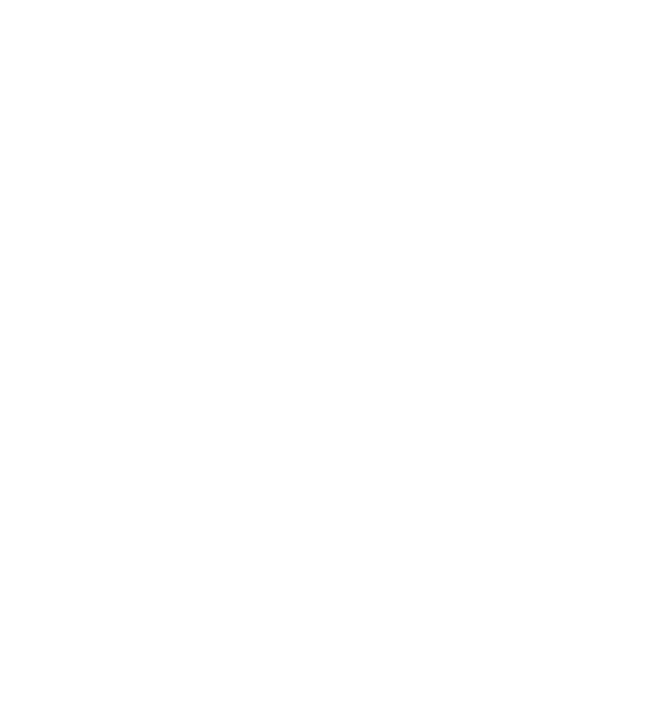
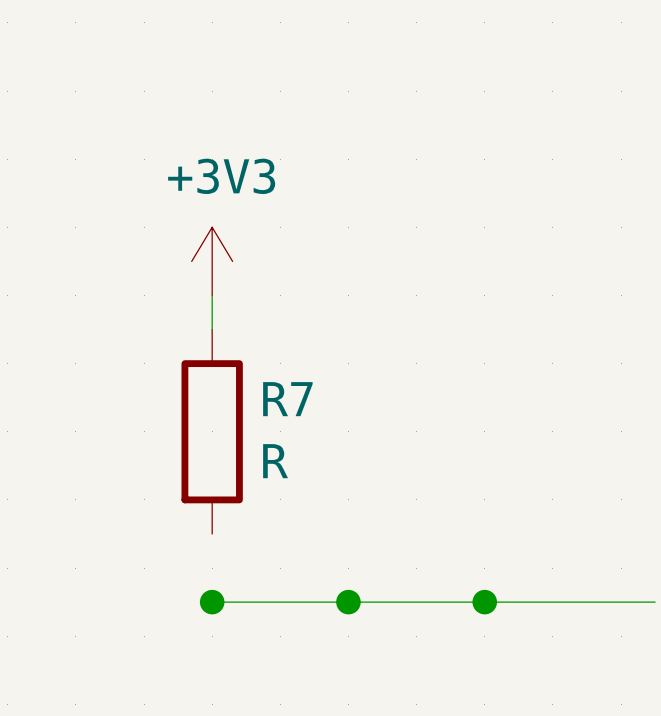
power symbol: none -> +3V3 (212, 261)
wire: none -> (212, 295) (212, 329)
R7: none -> R (212, 431)
wire: none -> (212, 602) (655, 602)
junction: none -> (212, 602)
junction: none -> (348, 602)
junction: none -> (484, 602)

